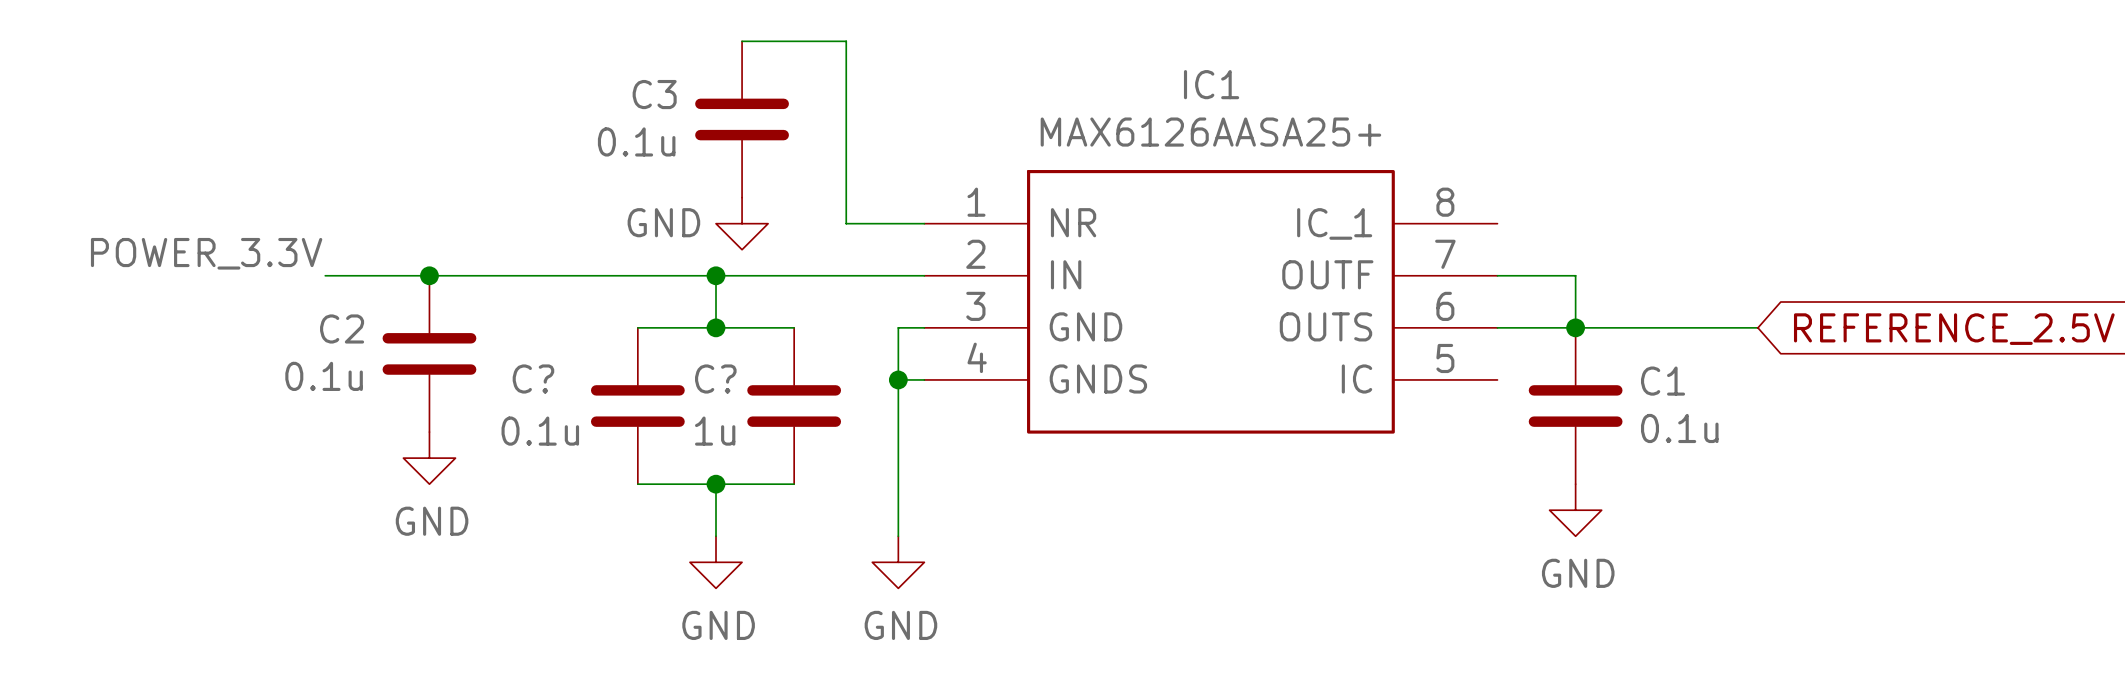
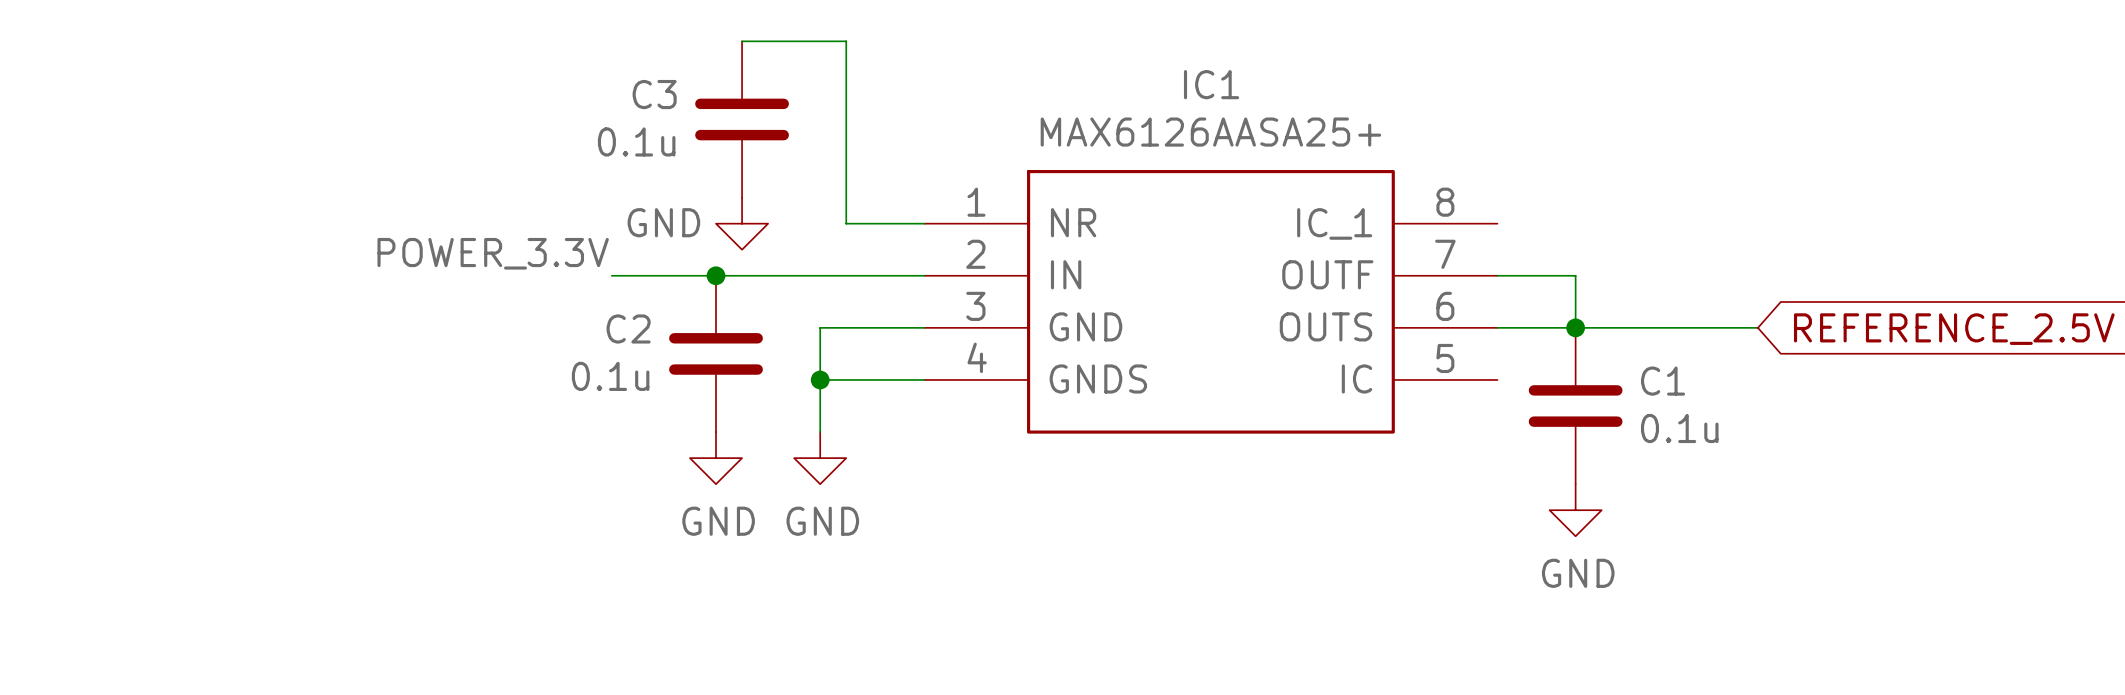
label position: POWER_3.3V (206, 253) -> POWER_3.3V (493, 253)
wire: (325, 275) (611, 275) -> none
junction: (429, 275) -> none
wire: (637, 327) (794, 327) -> none
junction: (716, 327) -> none
wire: (898, 327) (898, 536) -> (898, 327) (820, 327) (820, 432)
C2 position: (429, 353) -> (716, 353)
wire: none -> (820, 379) (898, 379)
junction: none -> (820, 379)
junction: (898, 379) -> none
C?: 0.1u (637, 406) -> none
C?: 1u (794, 406) -> none
power symbol: GND (429, 458) -> none
power symbol: none -> GND (716, 458)
power symbol: none -> GND (820, 458)
wire: (637, 484) (794, 484) -> none
wire: (716, 484) (716, 536) -> none
junction: (716, 484) -> none
power symbol: GND (716, 562) -> none
power symbol: GND (898, 562) -> none

